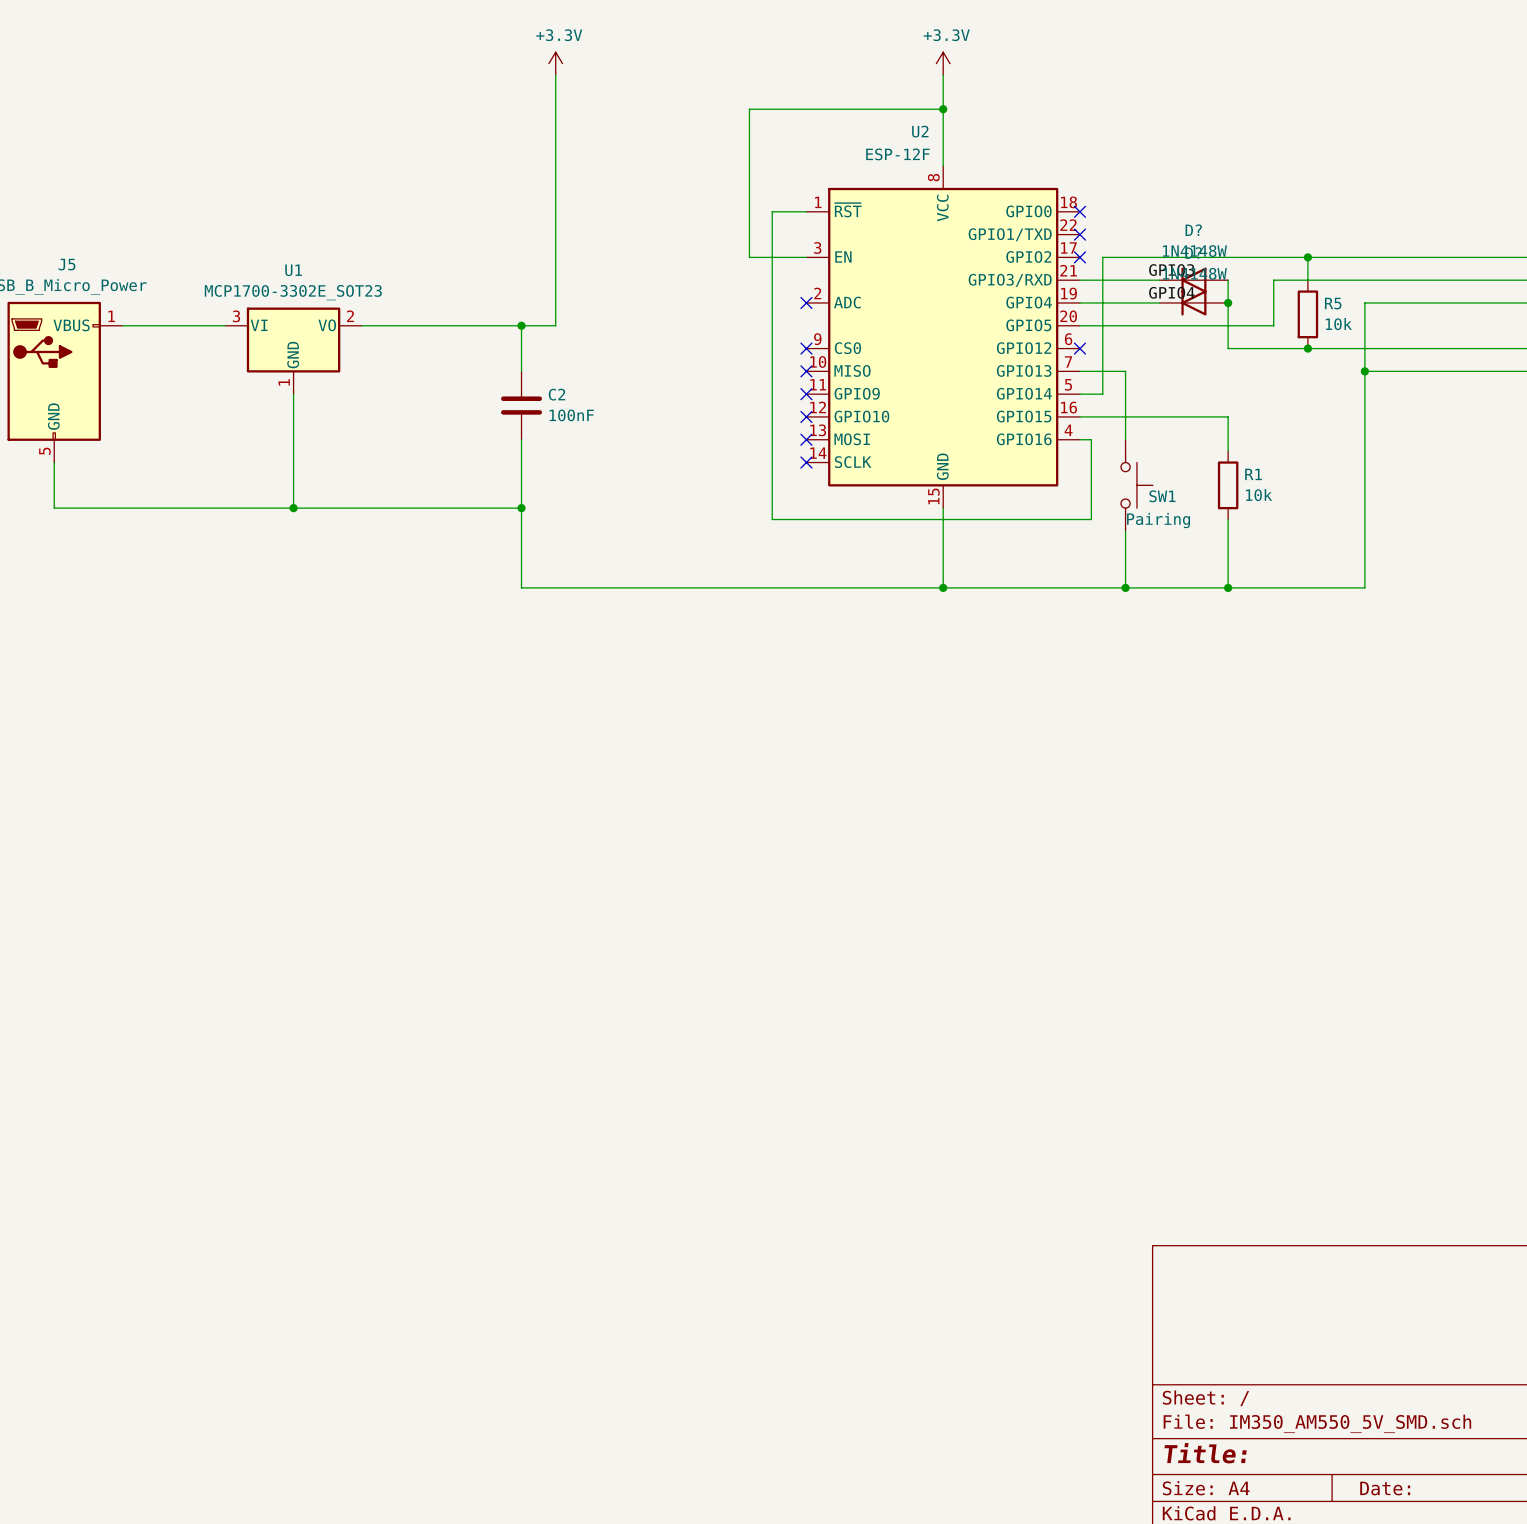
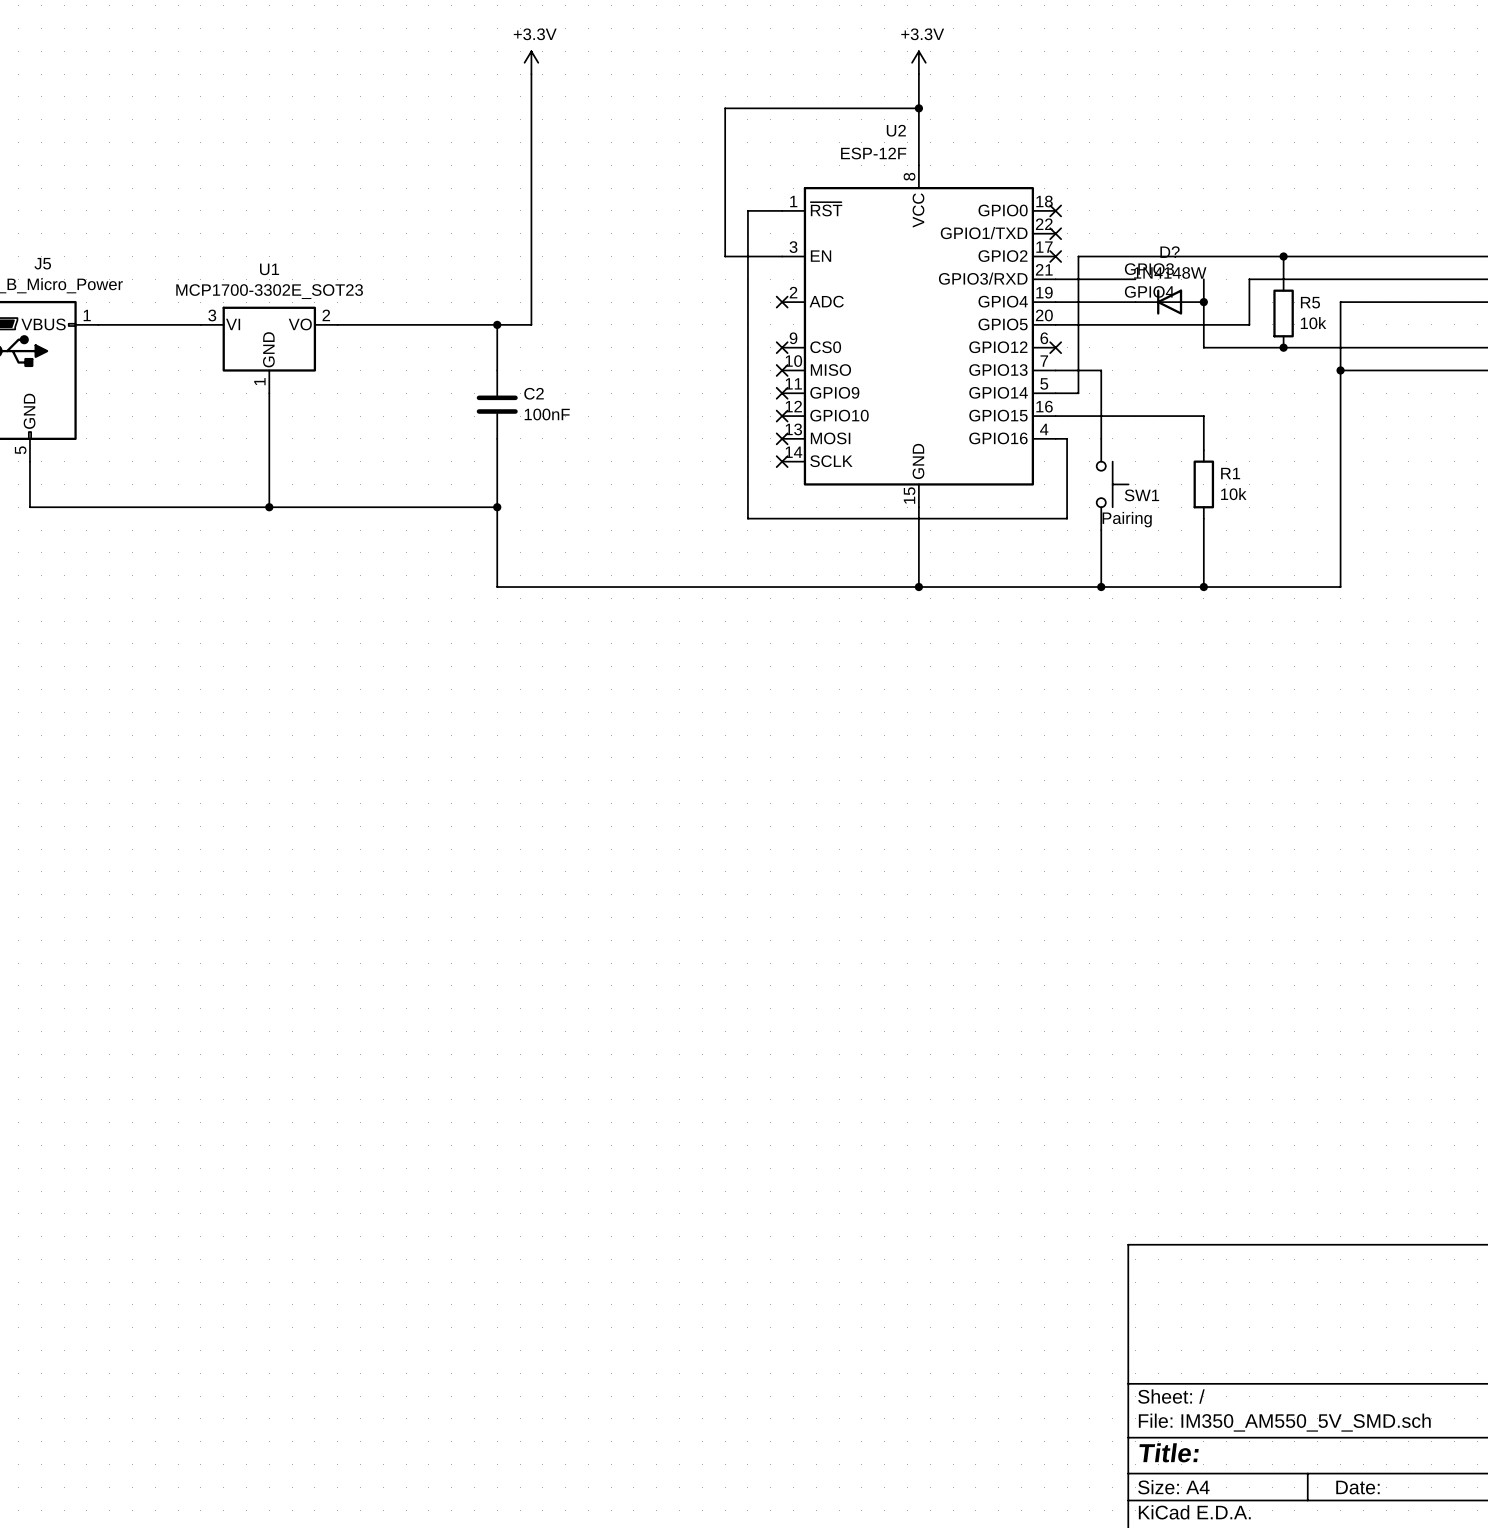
D?: 1N4148W (1193, 280) -> none

